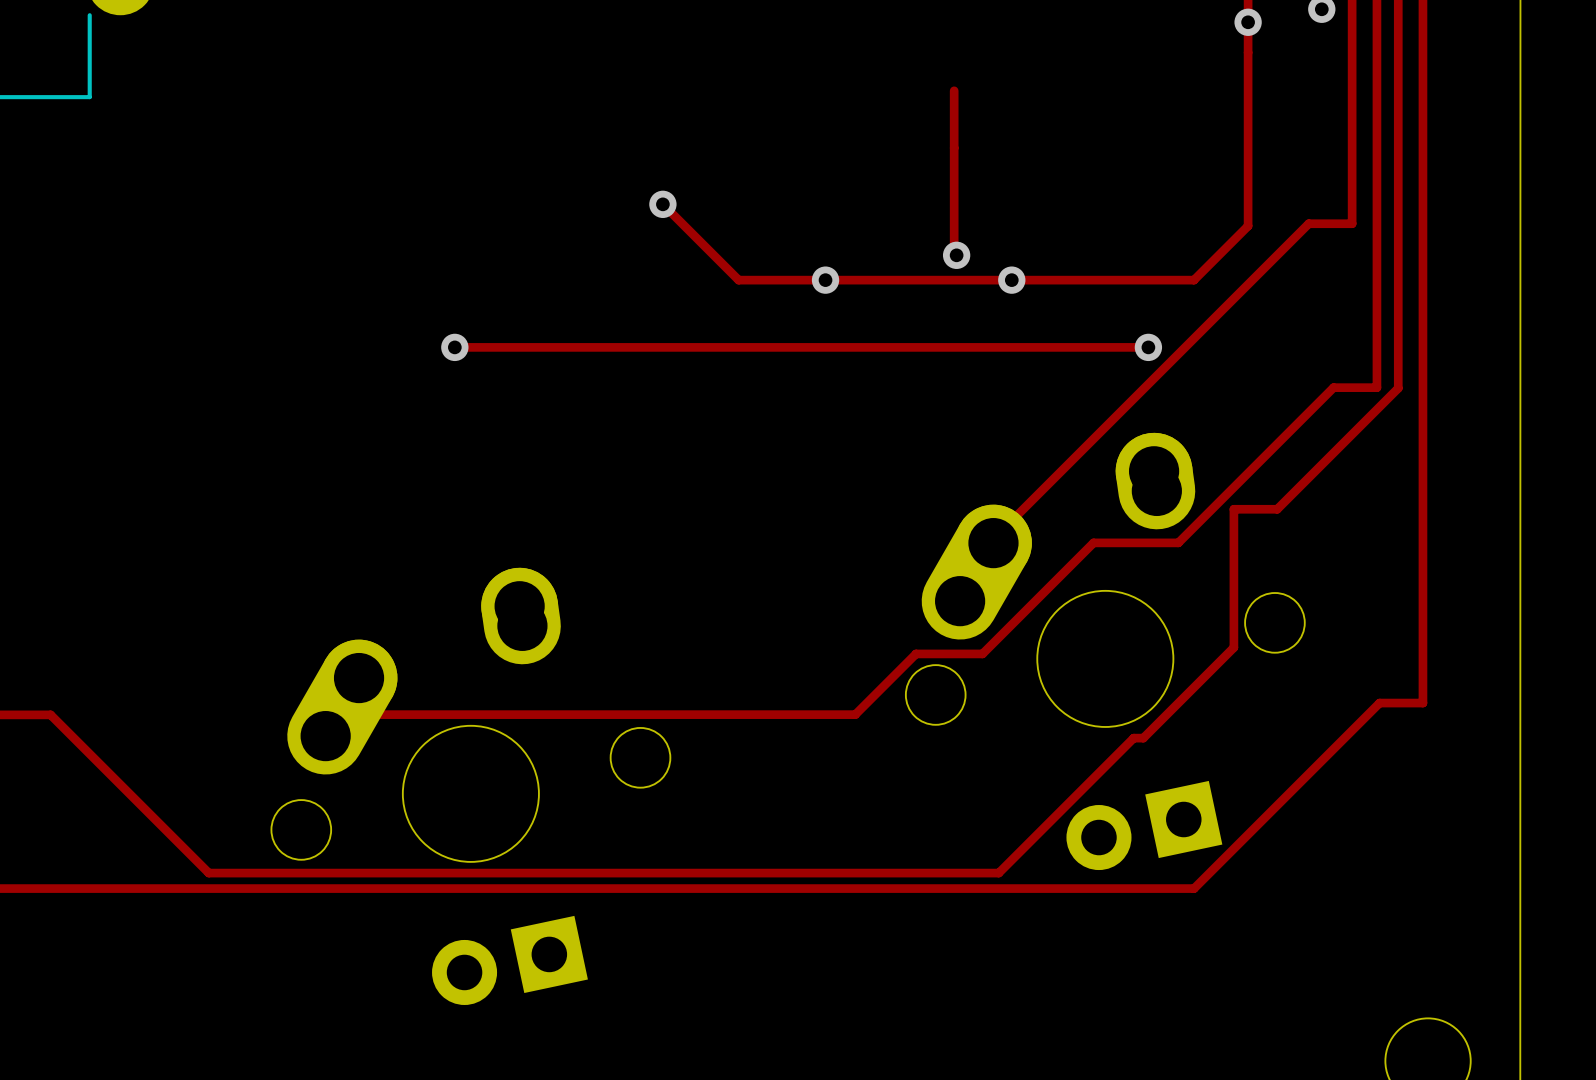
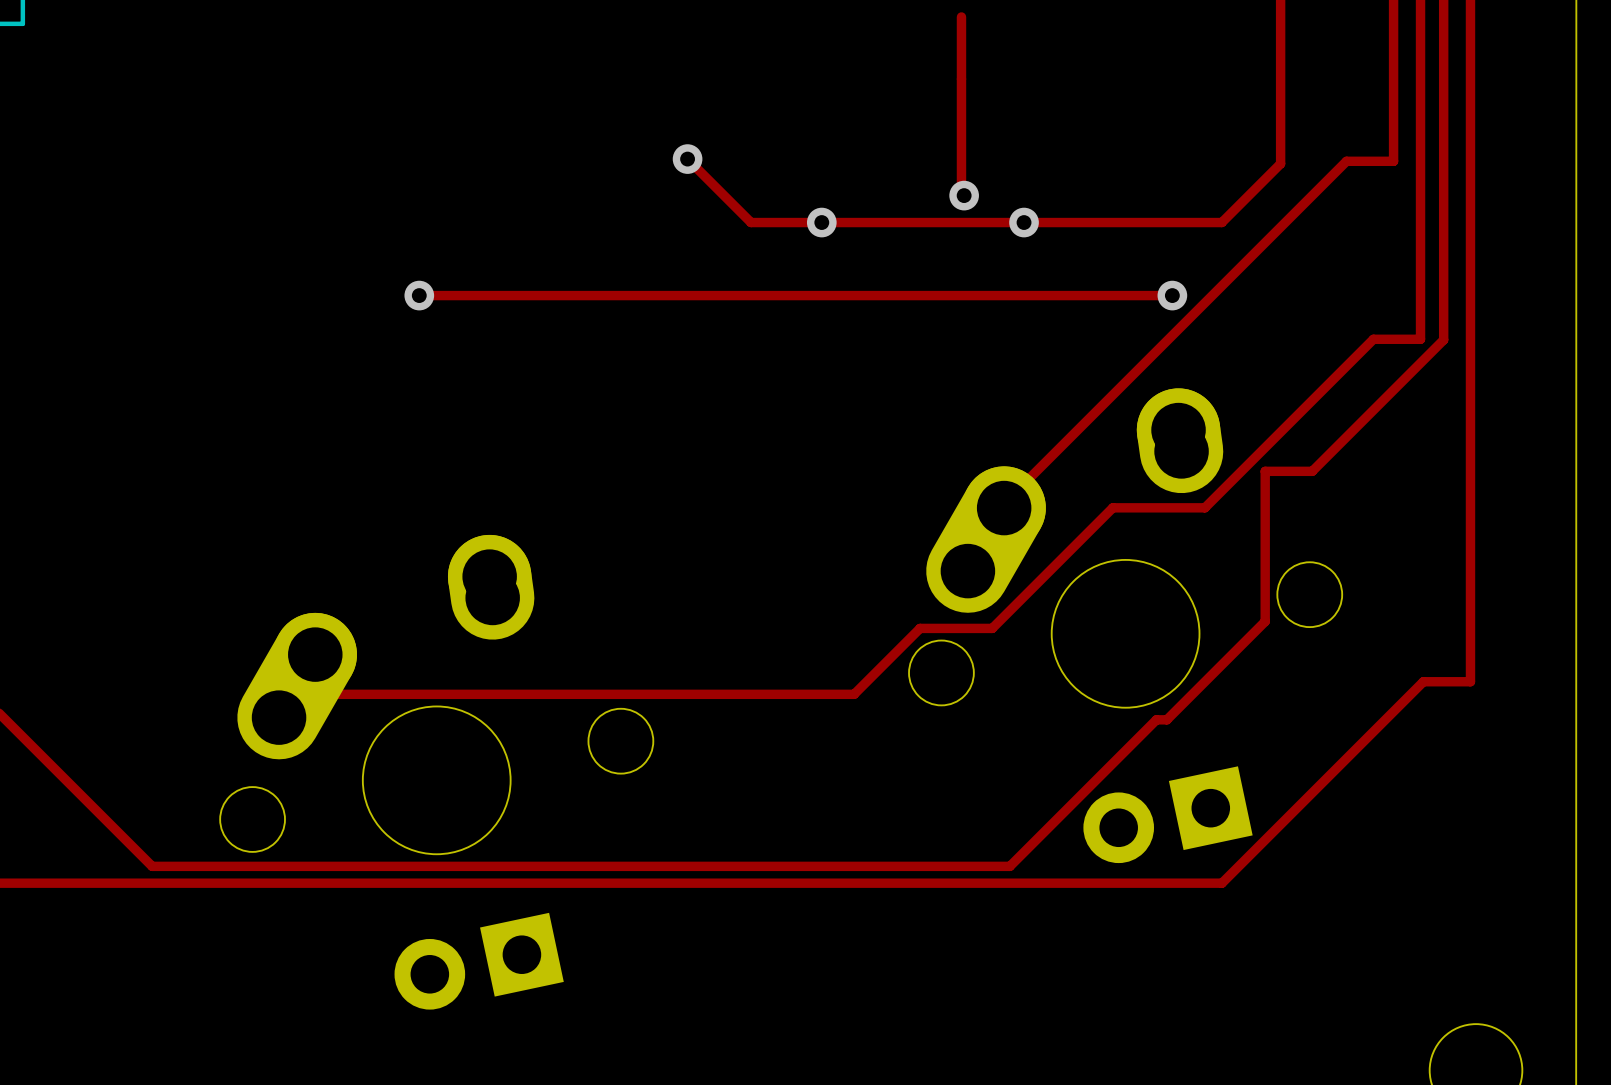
track: (662, 204) (738, 280) (760, 280) -> (687, 159) (751, 222)
via position: (662, 204) -> (687, 159)

